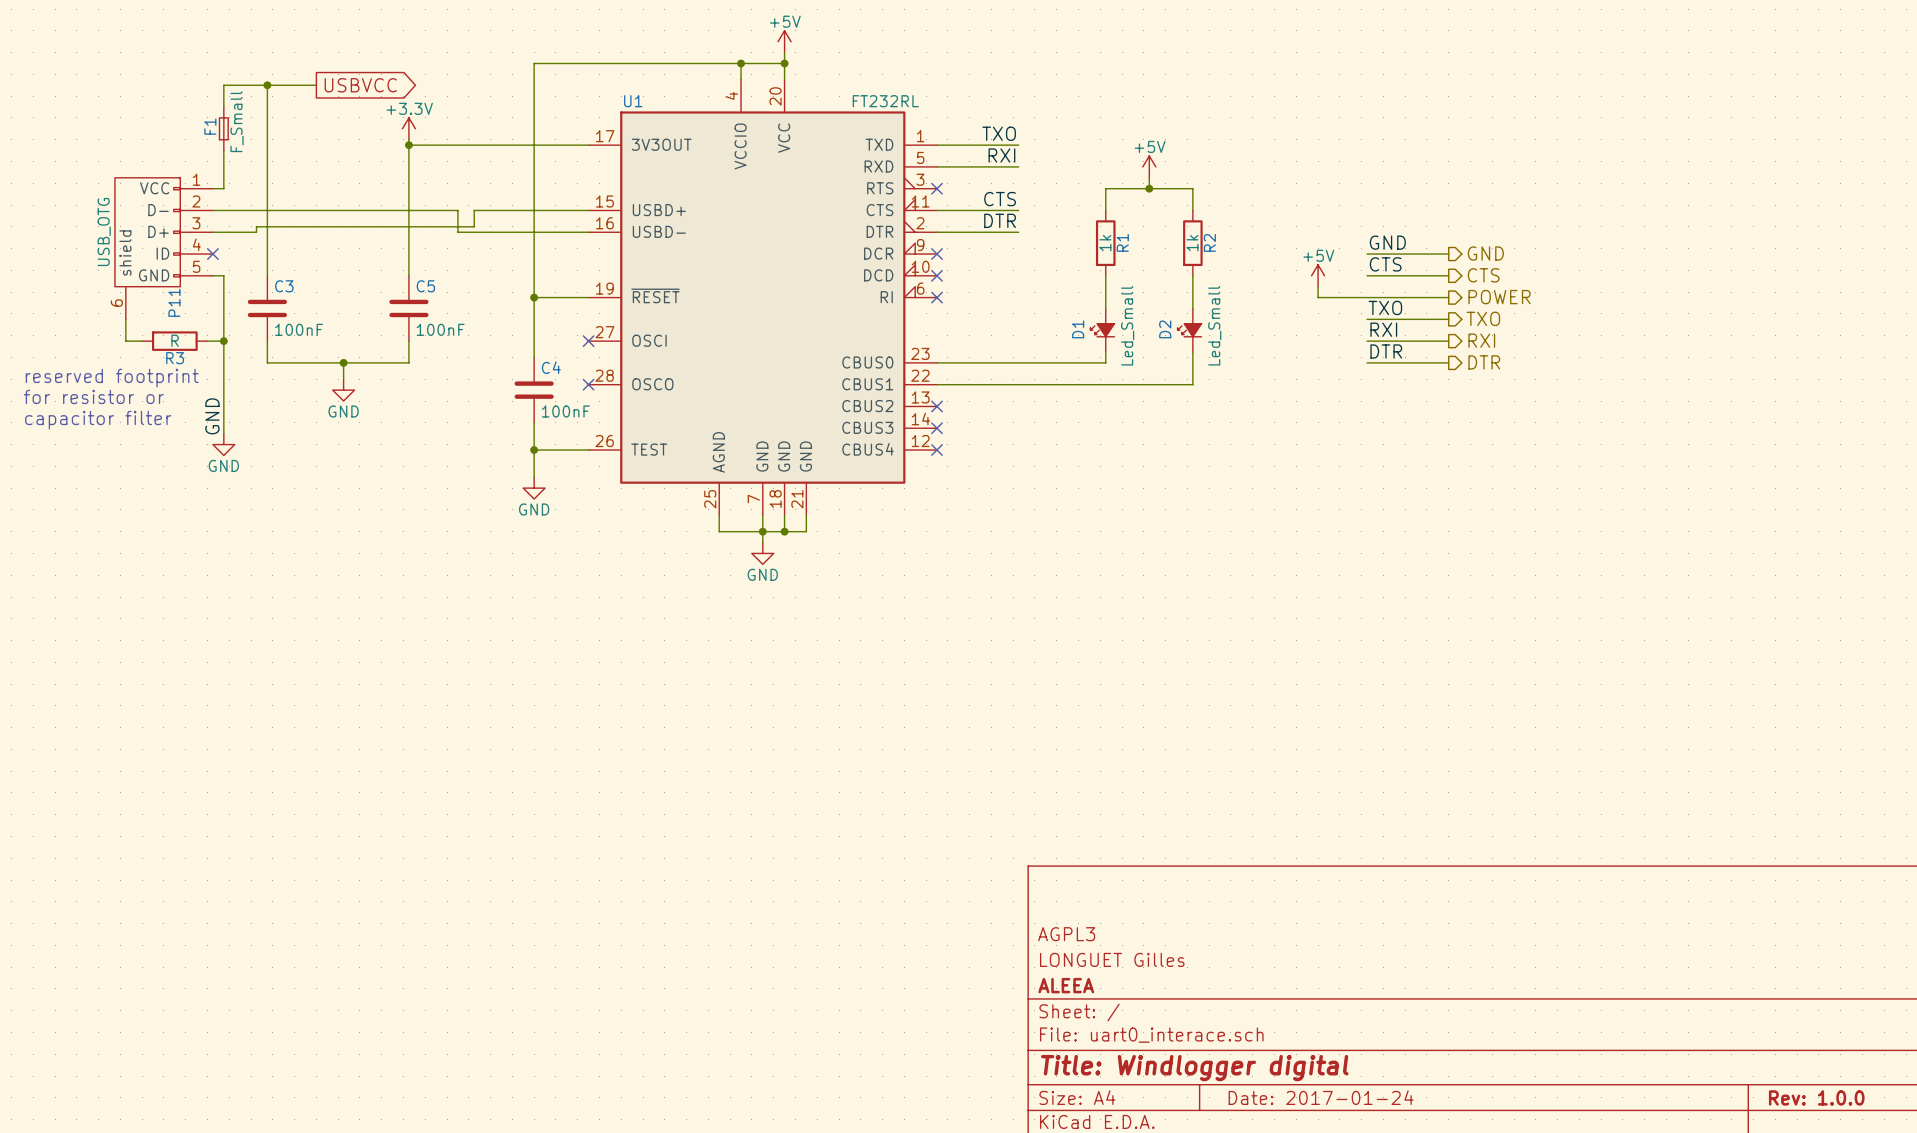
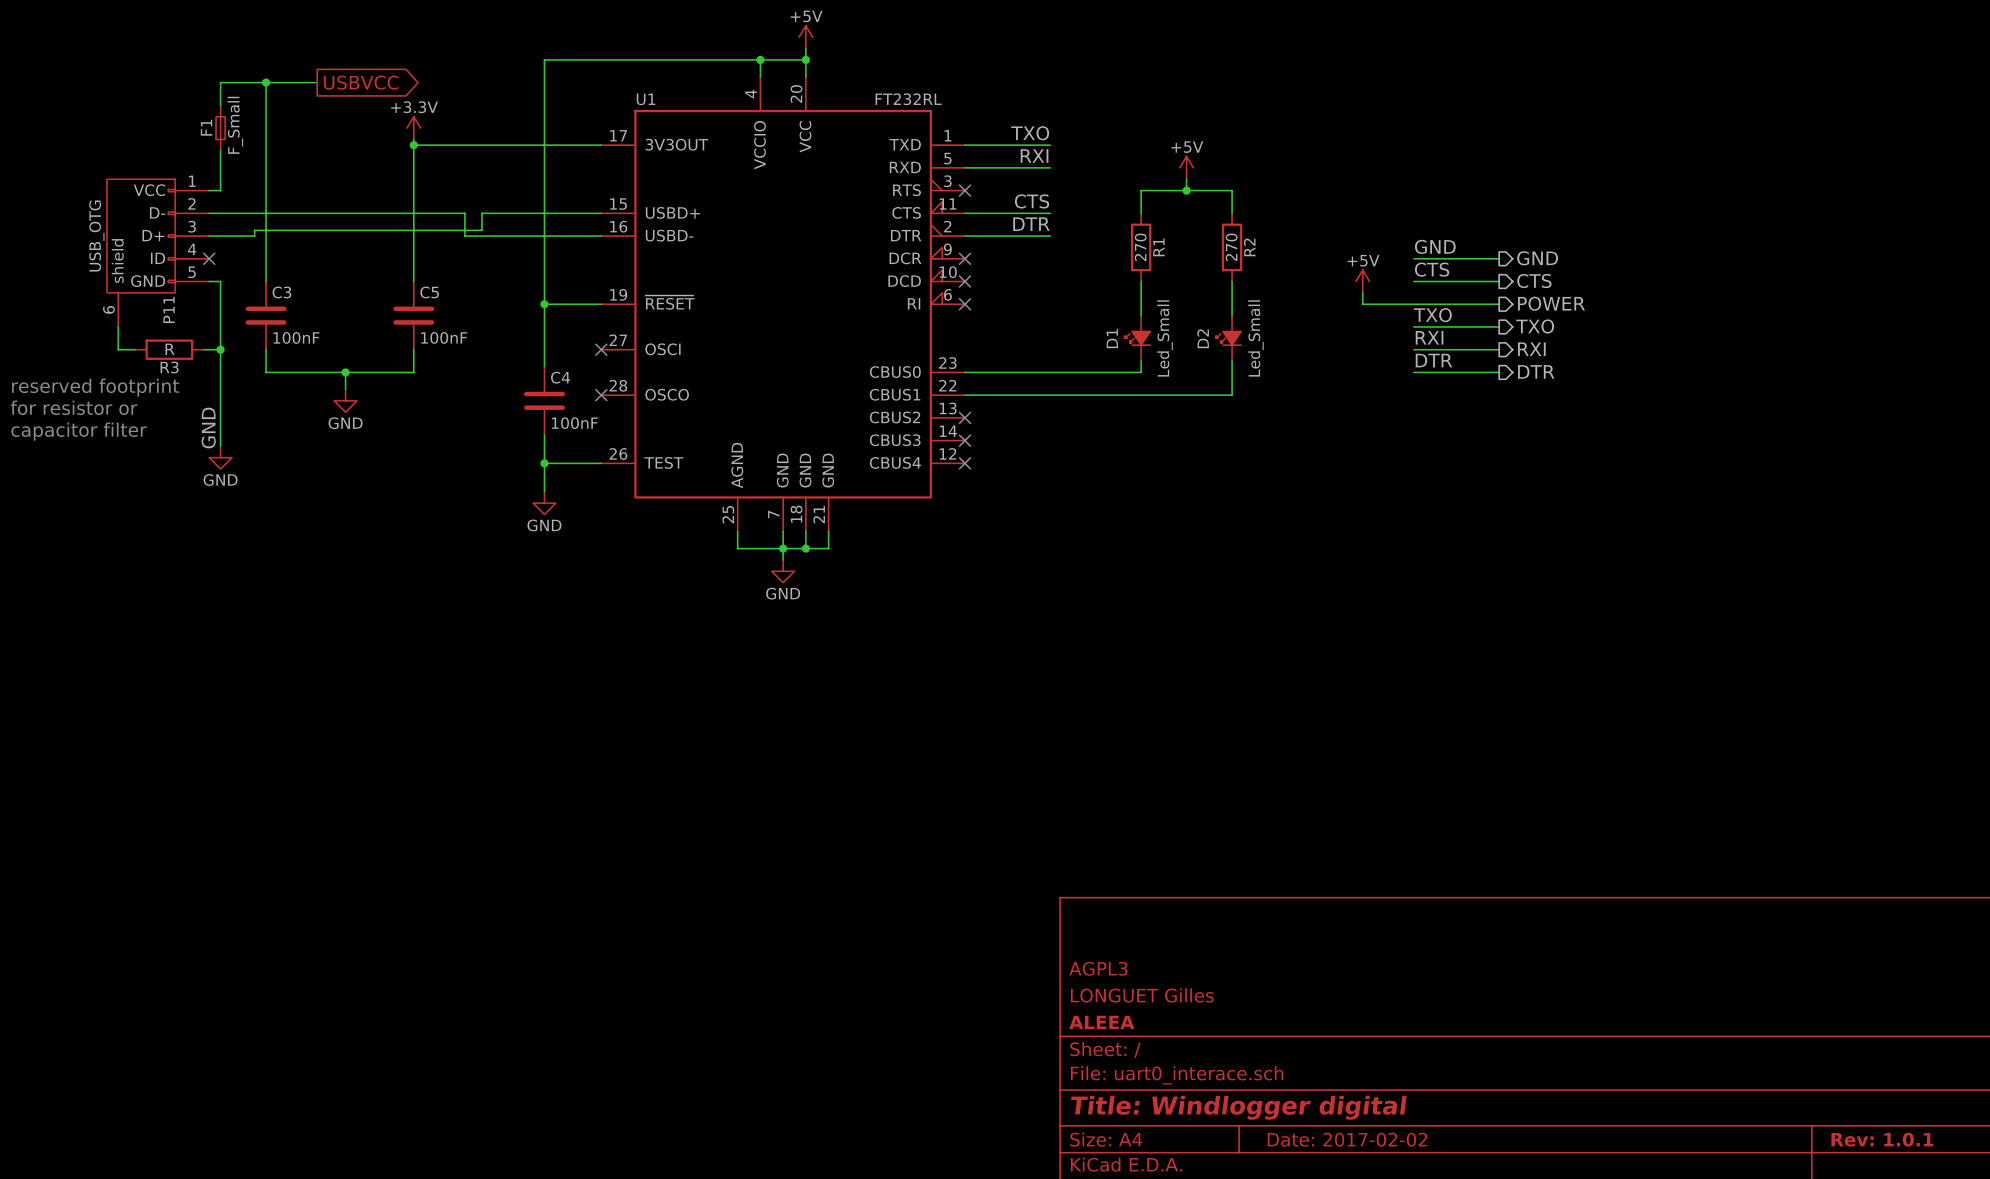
R1 value: 1k (1105, 243) -> 270 (1140, 247)
R2 value: 1k (1192, 243) -> 270 (1231, 247)
title block: Date: 2017-01-24 (1321, 1097) -> Date: 2017-02-02 (1347, 1139)
title block: Rev: 1.0.0 (1816, 1097) -> Rev: 1.0.1 (1882, 1139)

